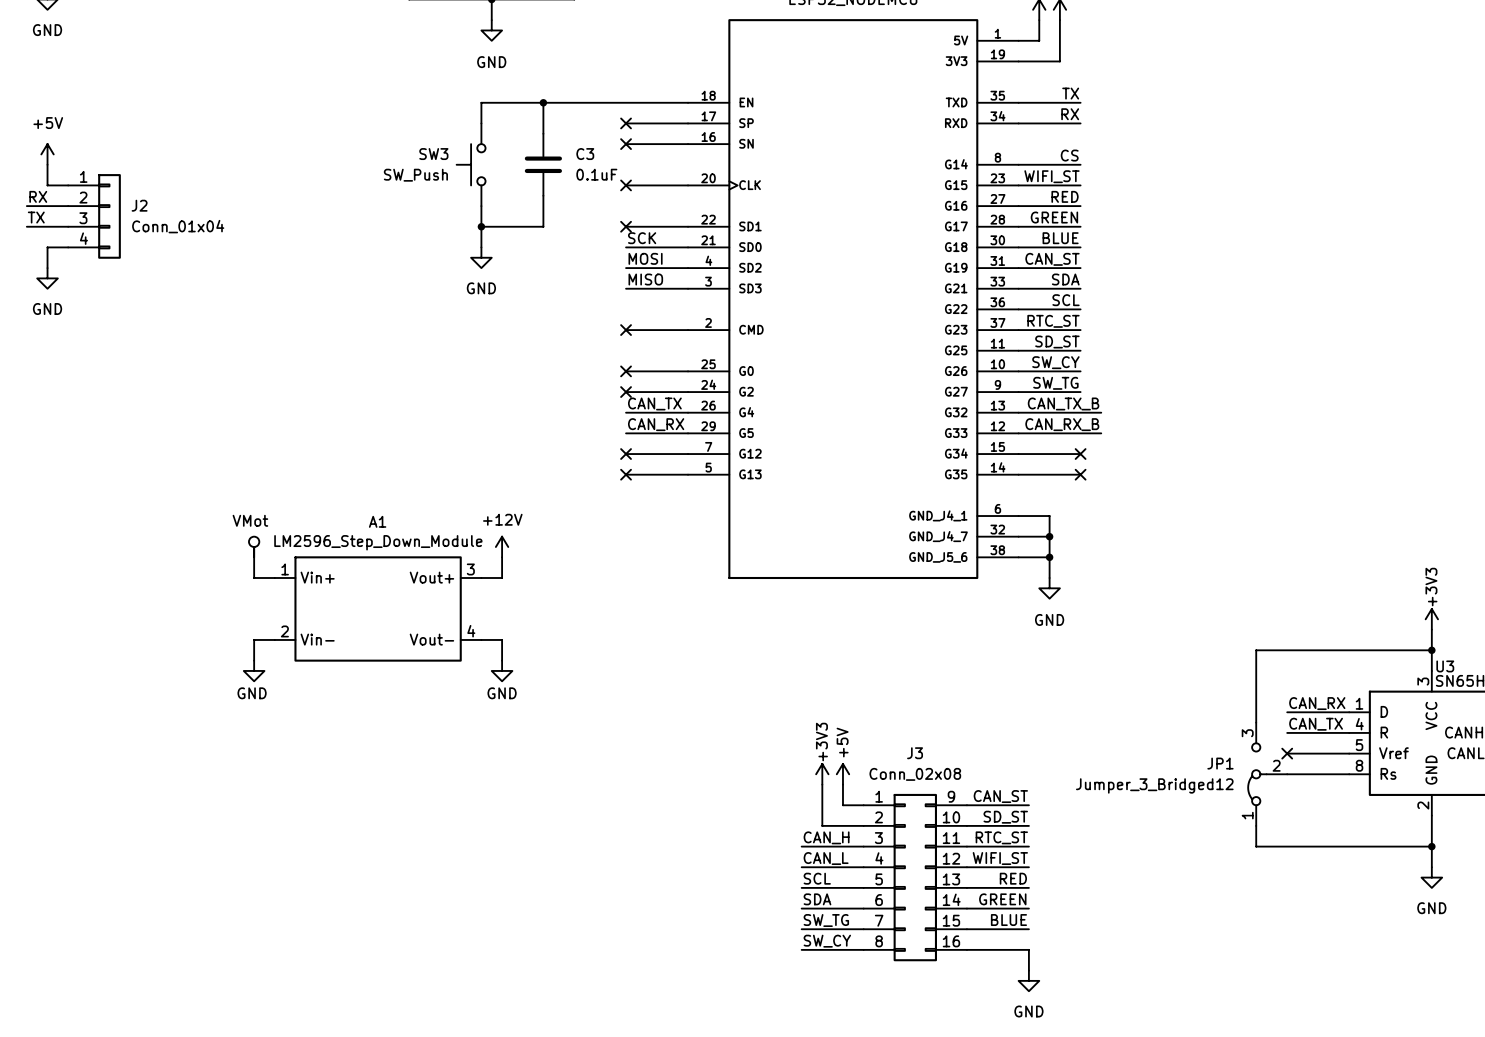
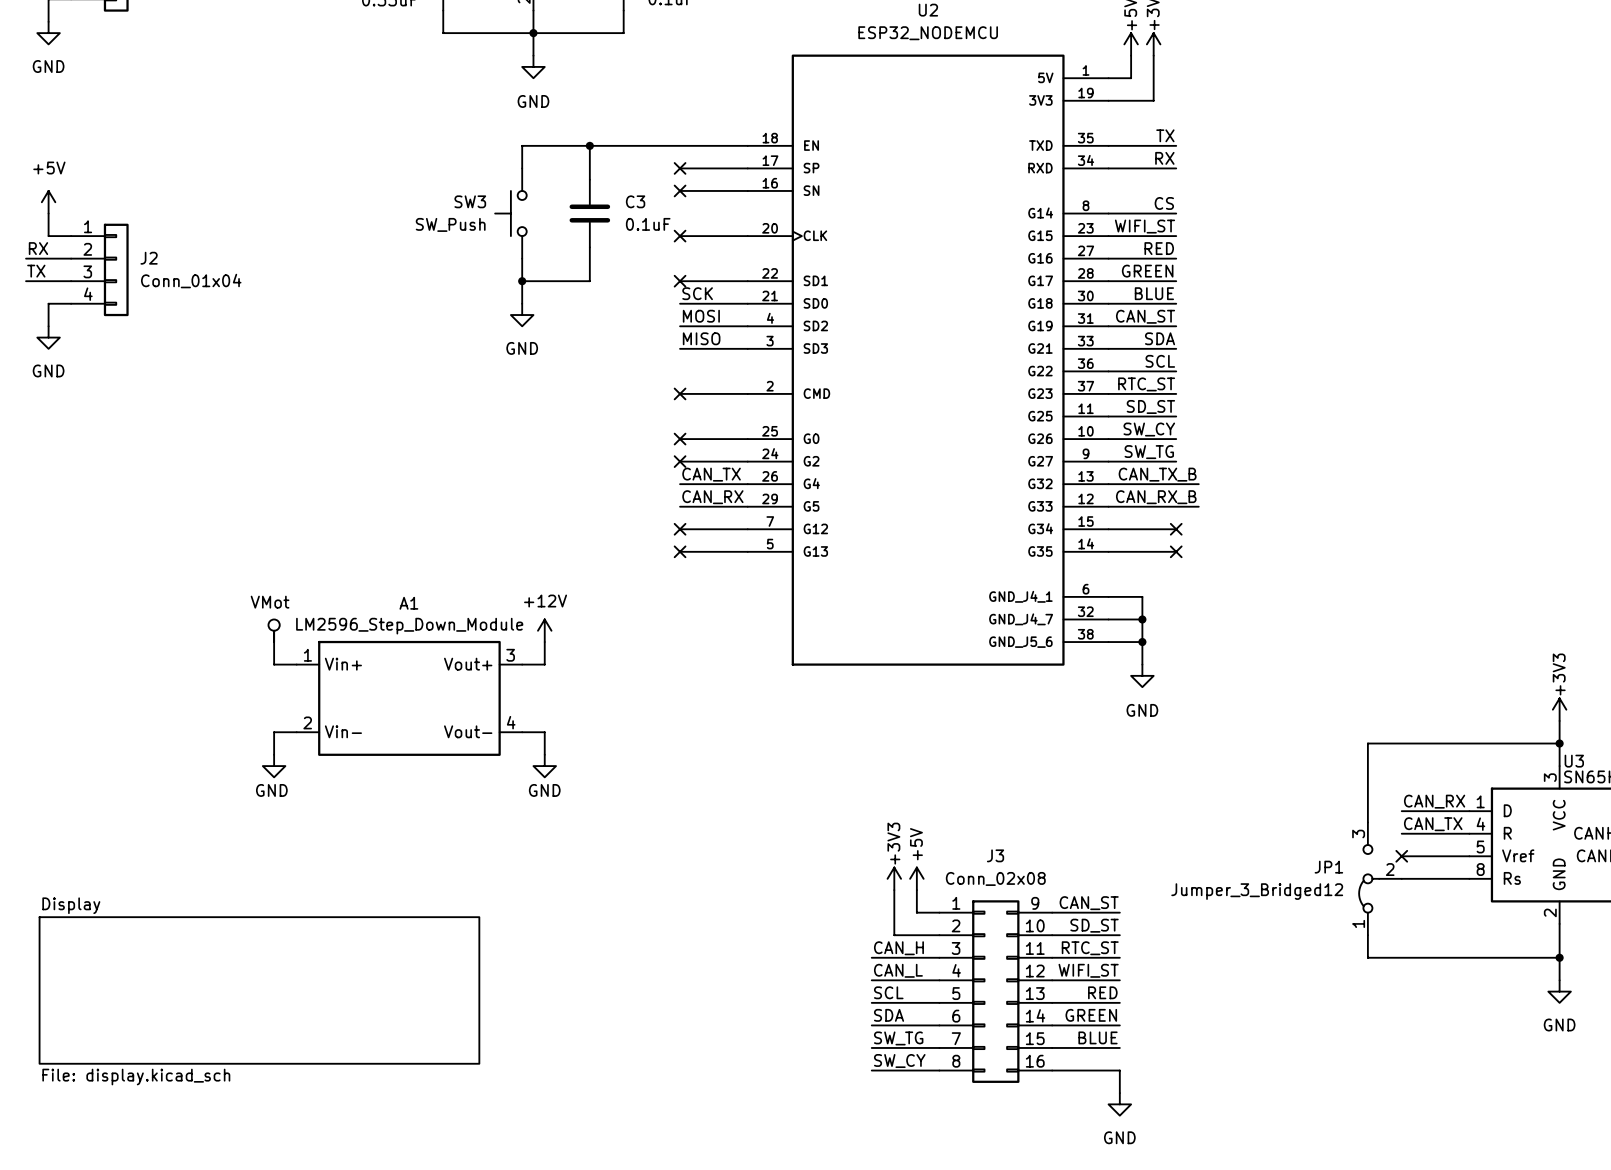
sheet Display: none -> File: display.kicad_sch (259, 990)

